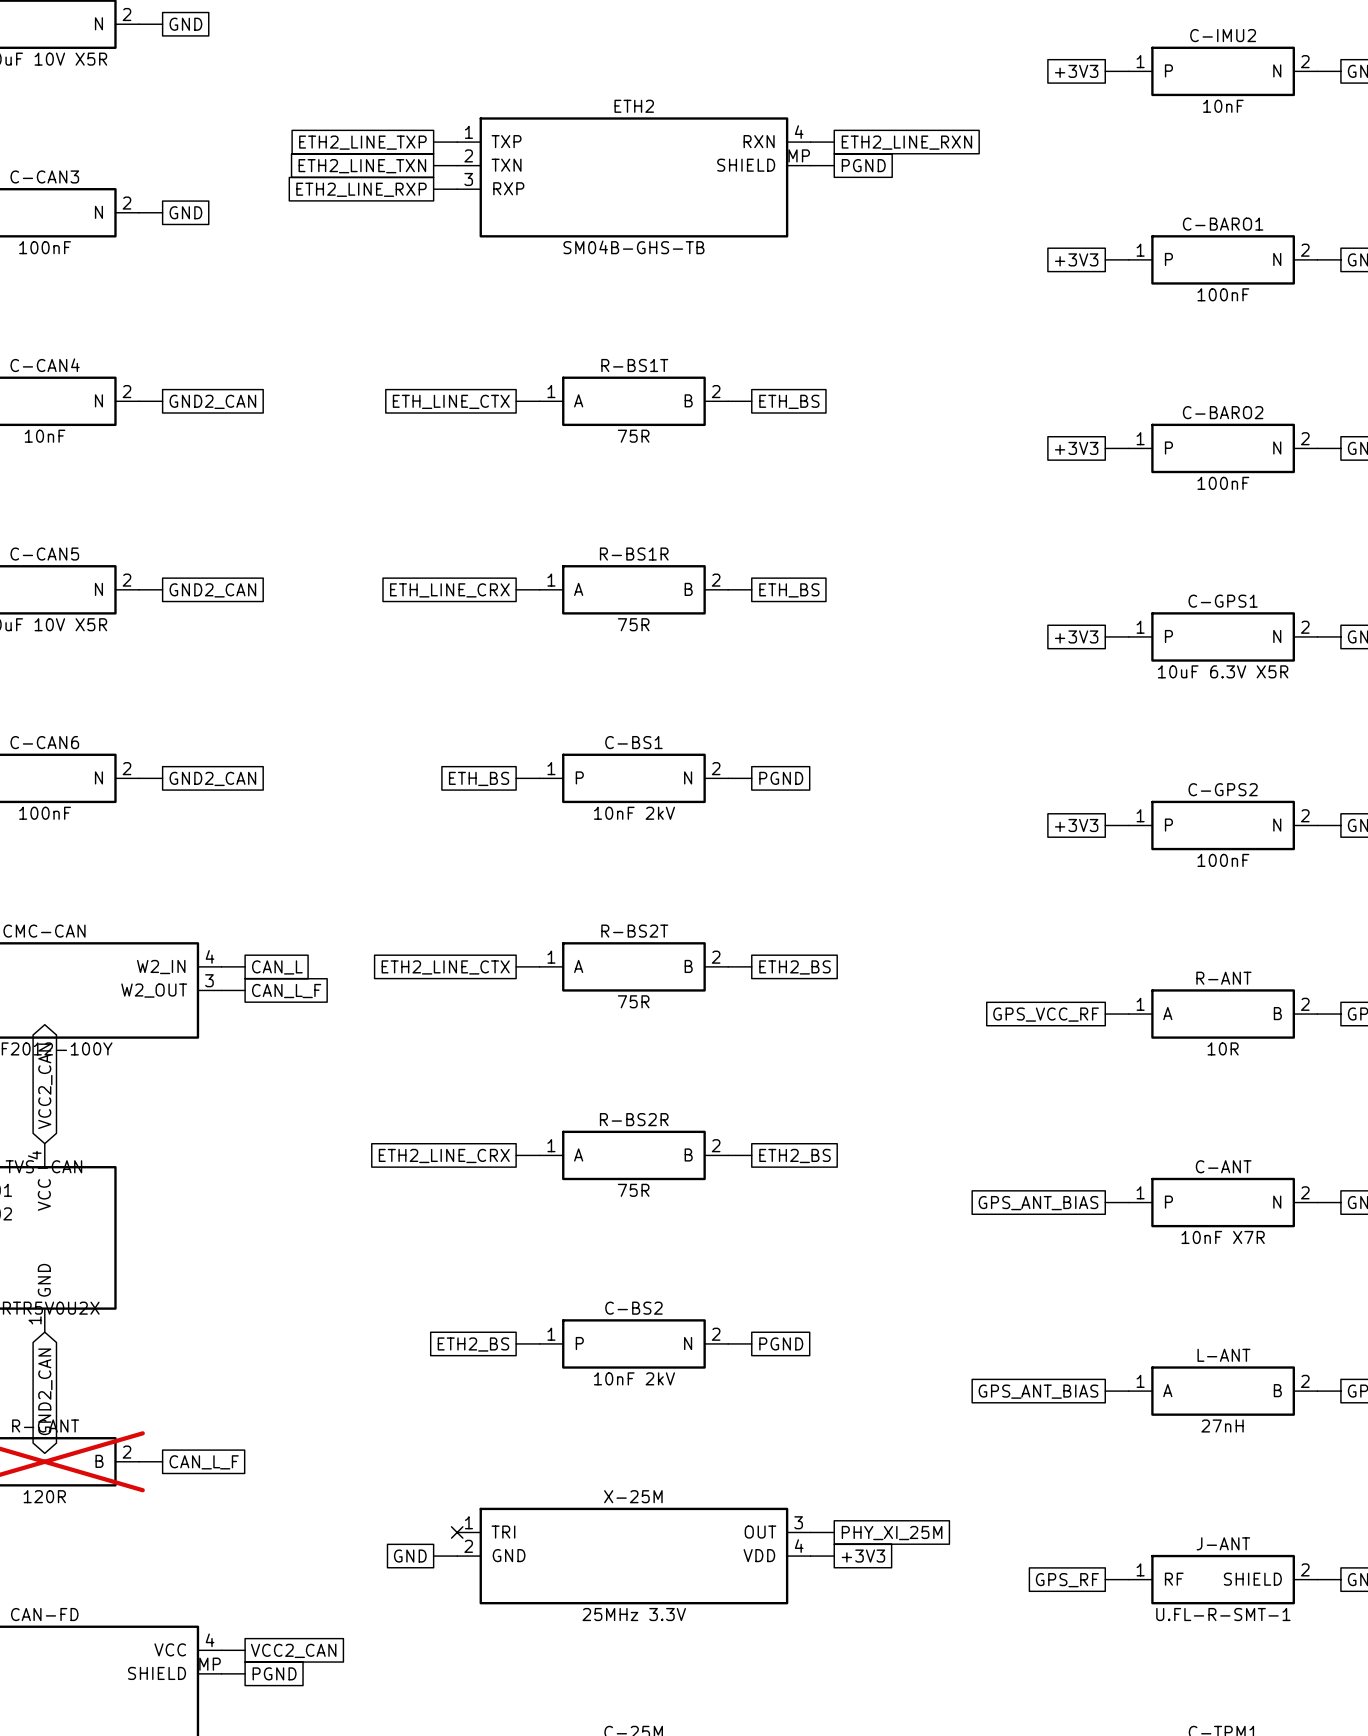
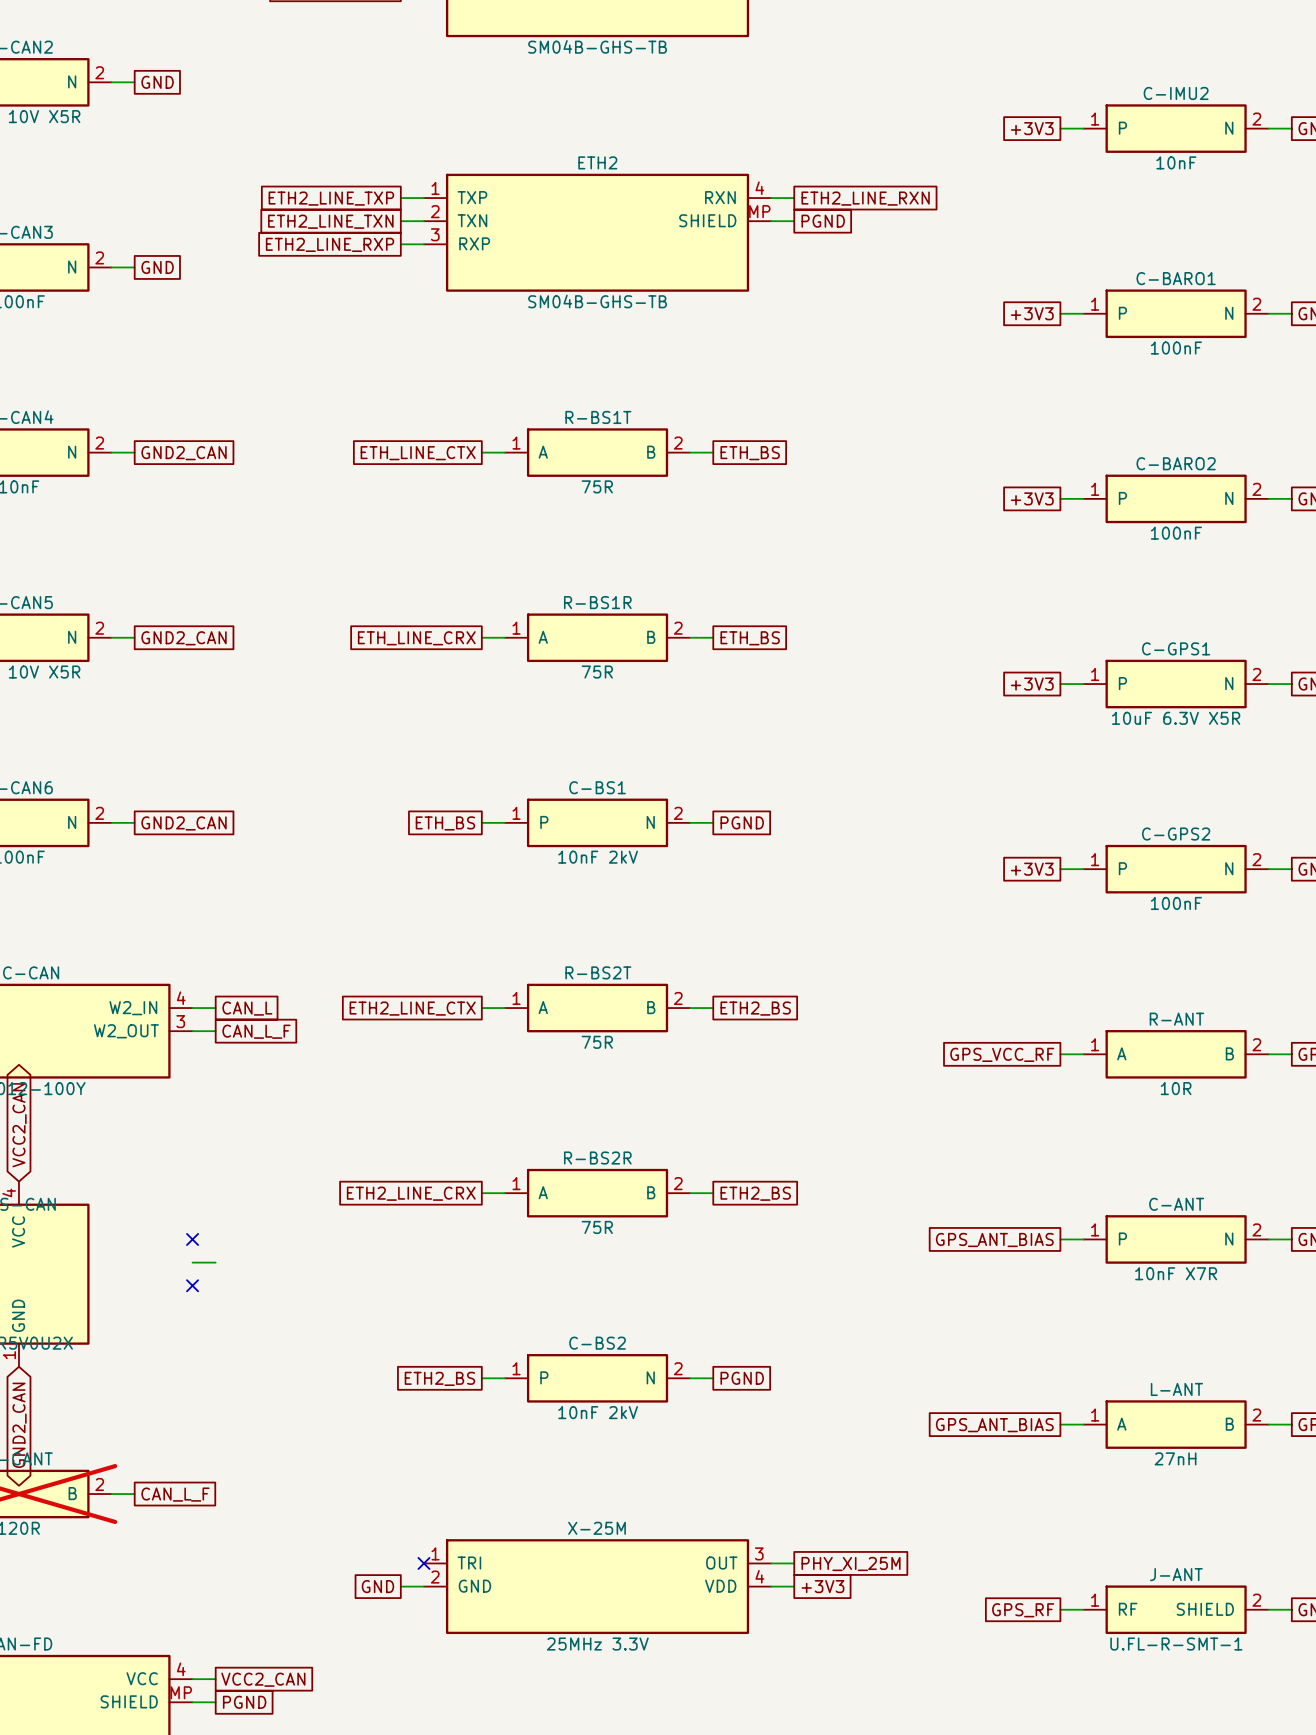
no-connect mark: none -> (192, 1239)
wire: none -> (192, 1262) (215, 1262)
no-connect mark: none -> (192, 1285)

